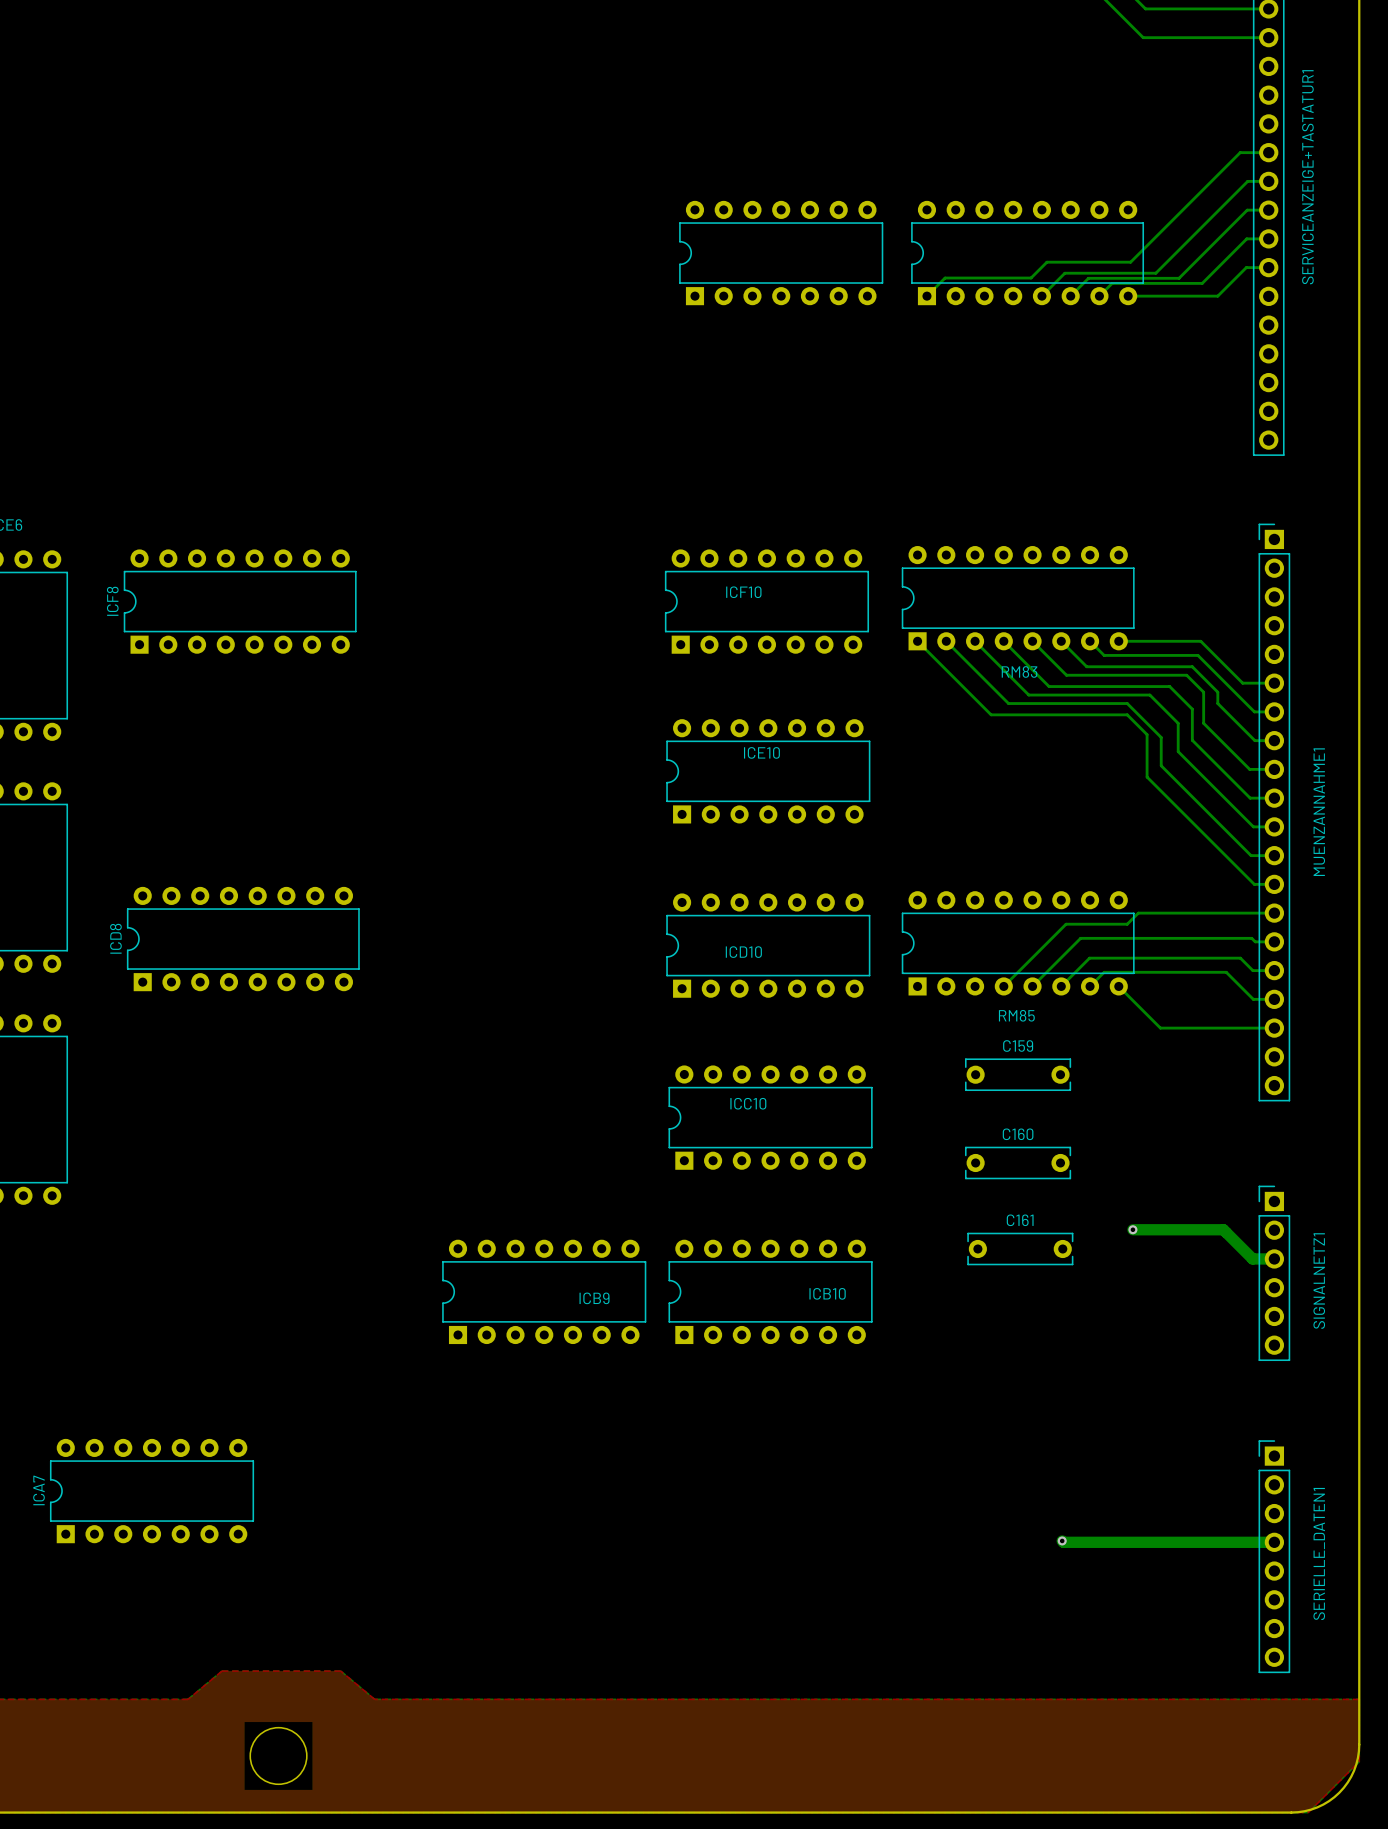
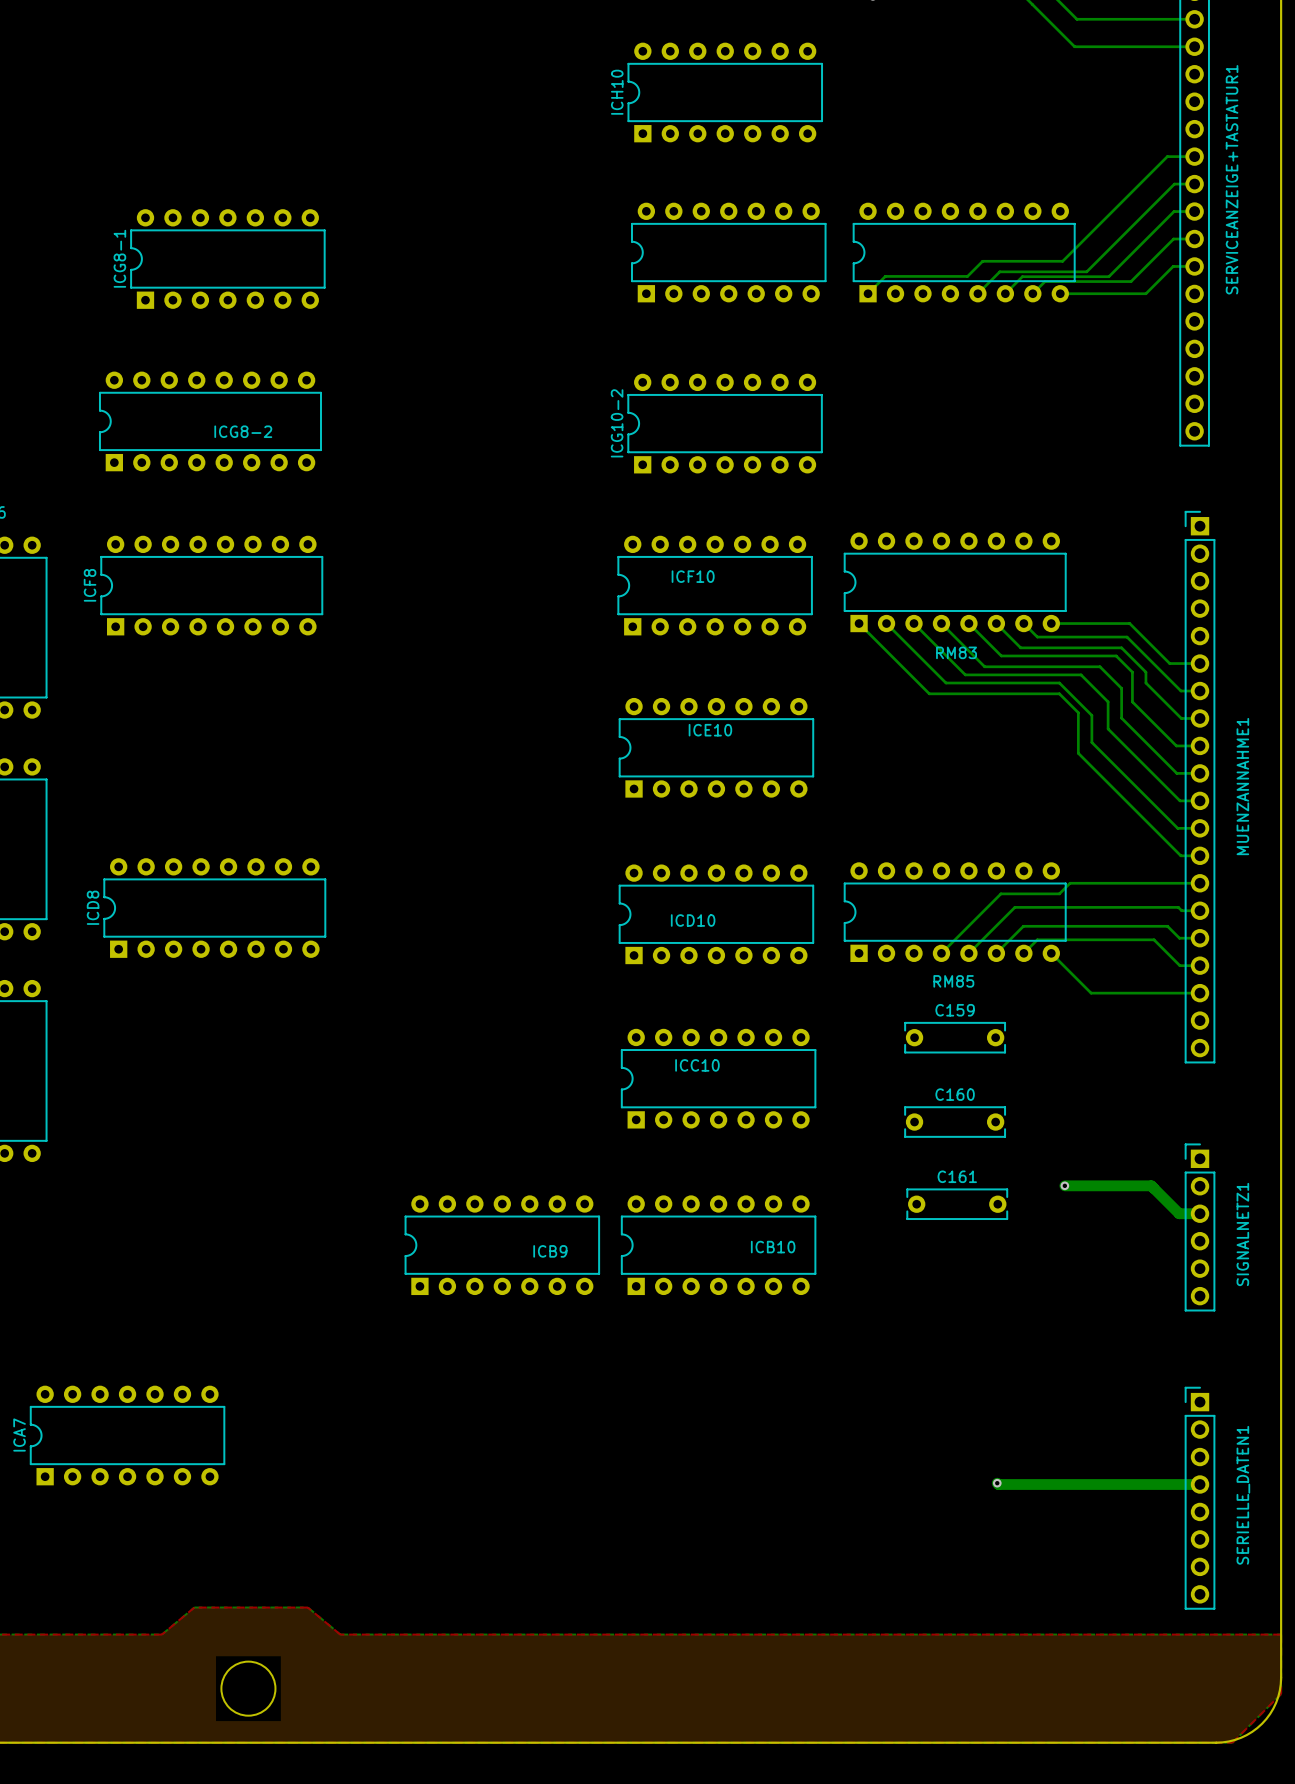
ICH10: none -> (725, 92)
ICG8-1: none -> (227, 259)
ICG8-2: none -> (210, 421)
ICG10-2: none -> (725, 423)

